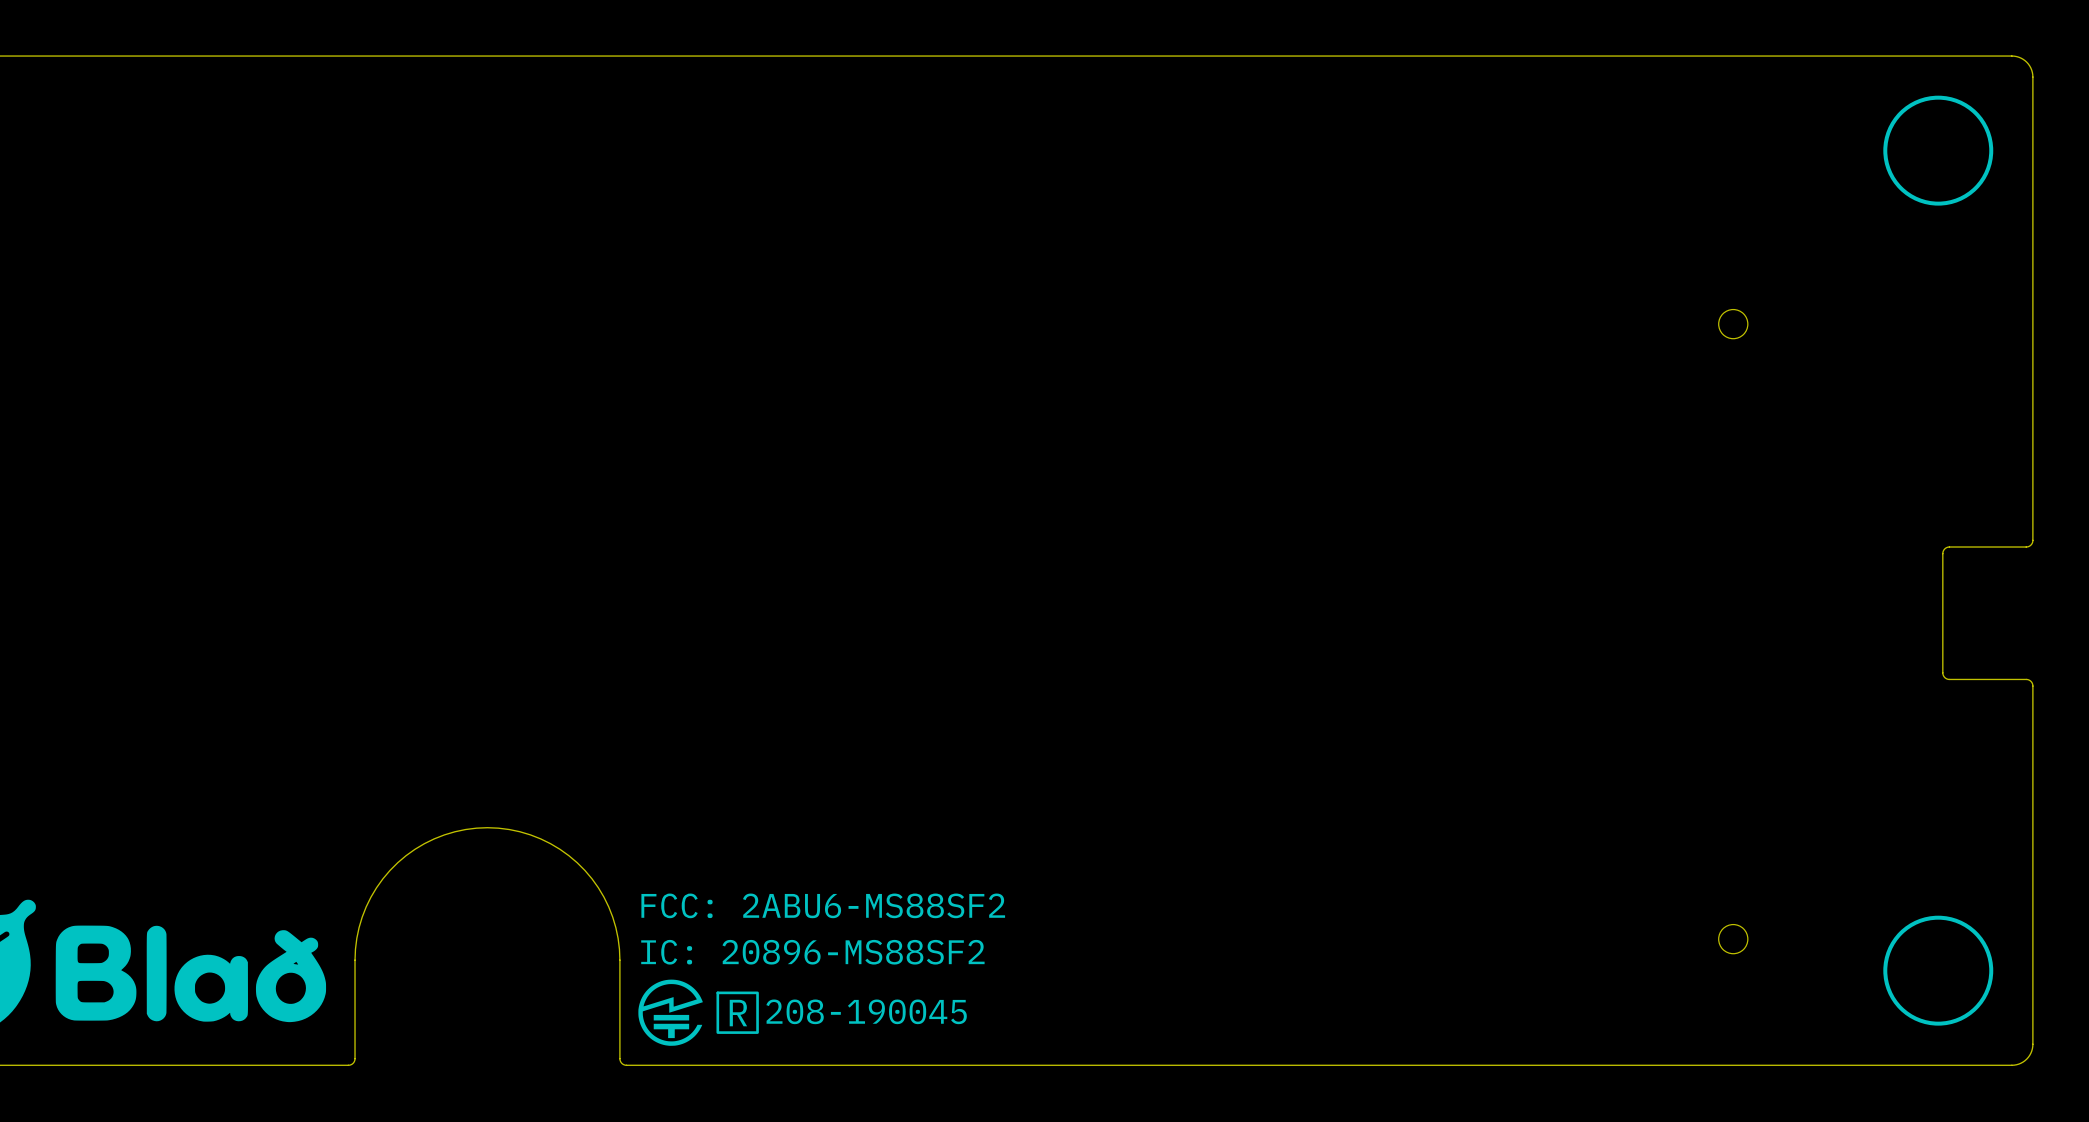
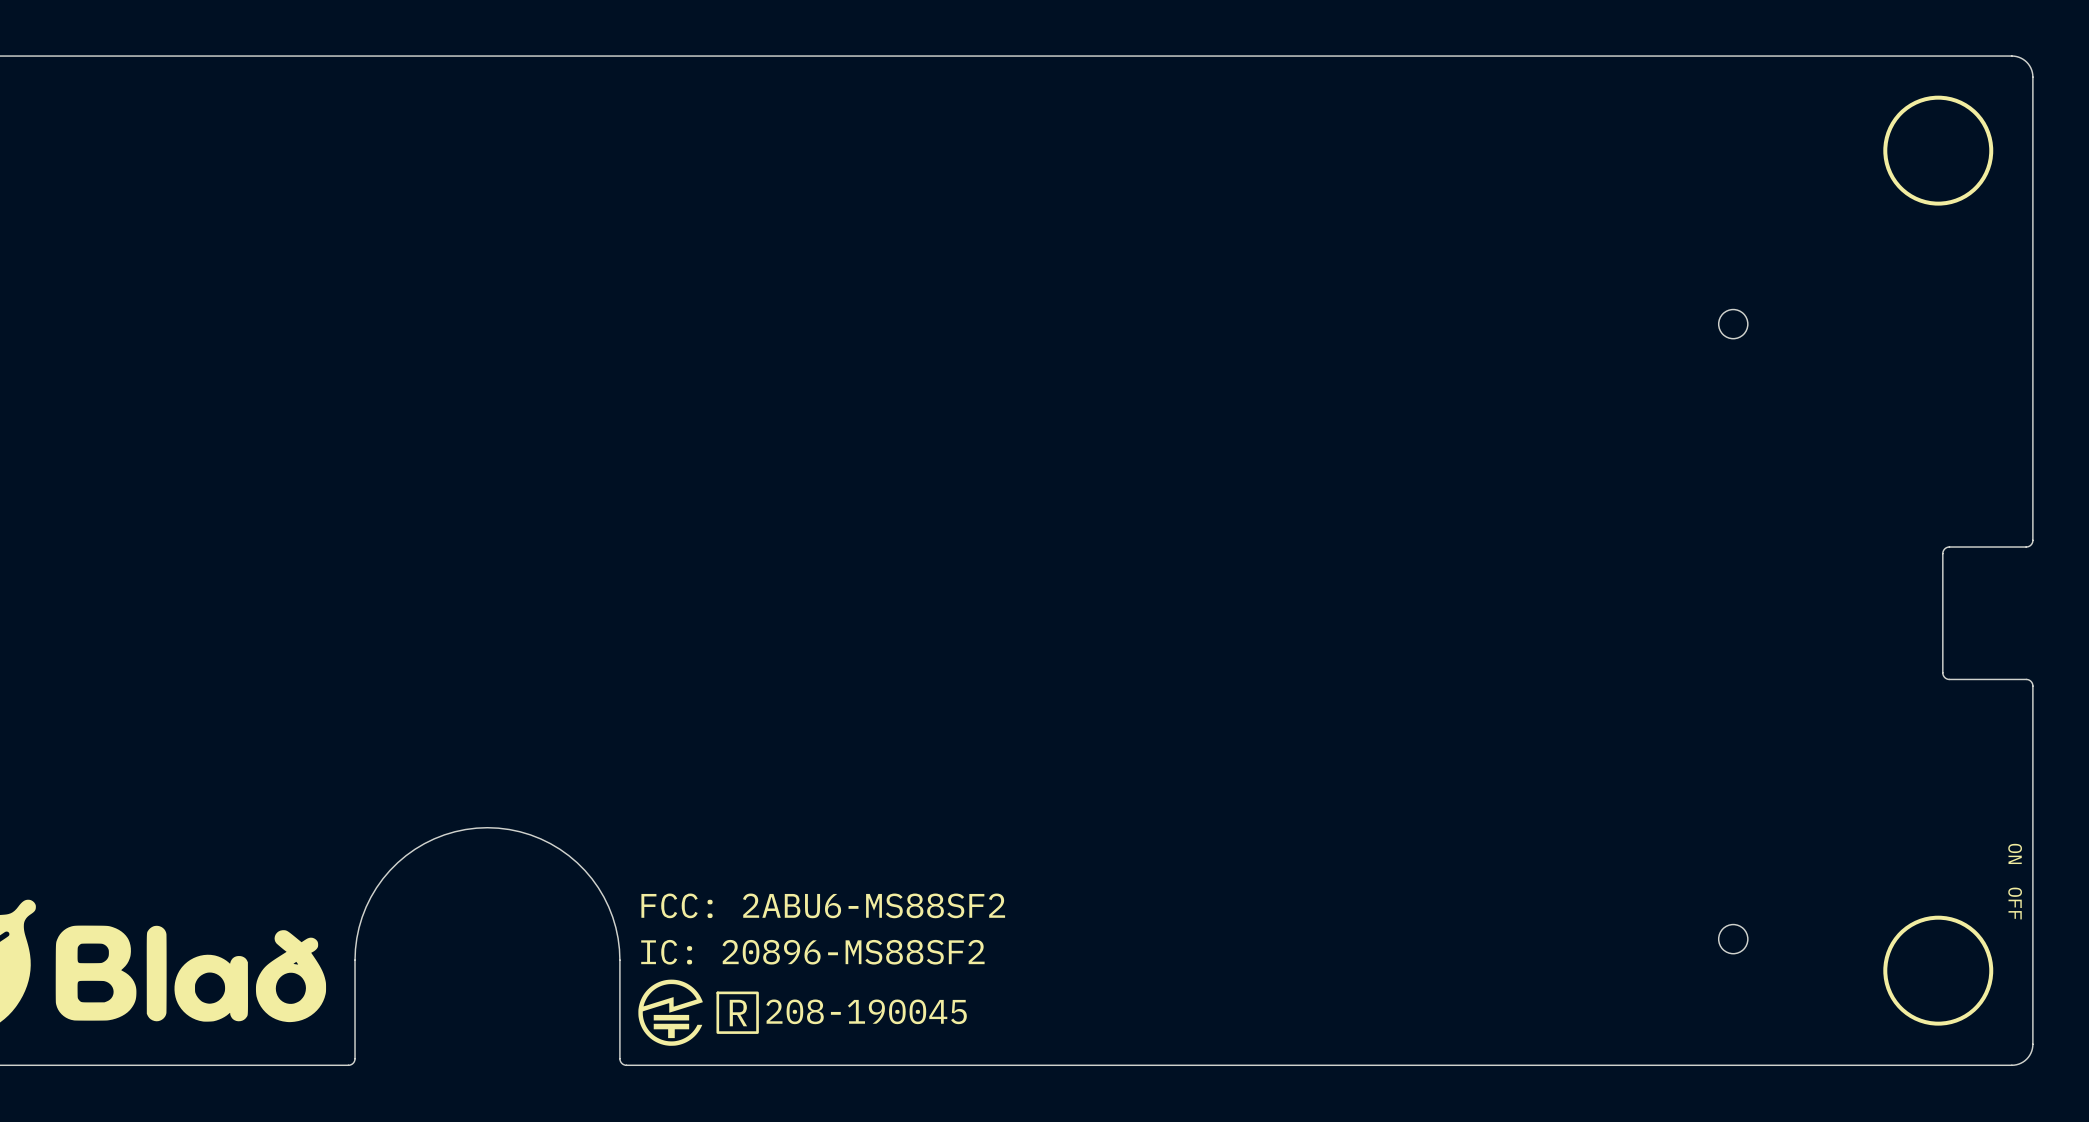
text: none -> ON (2015, 853)
text: none -> OFF (2015, 903)

